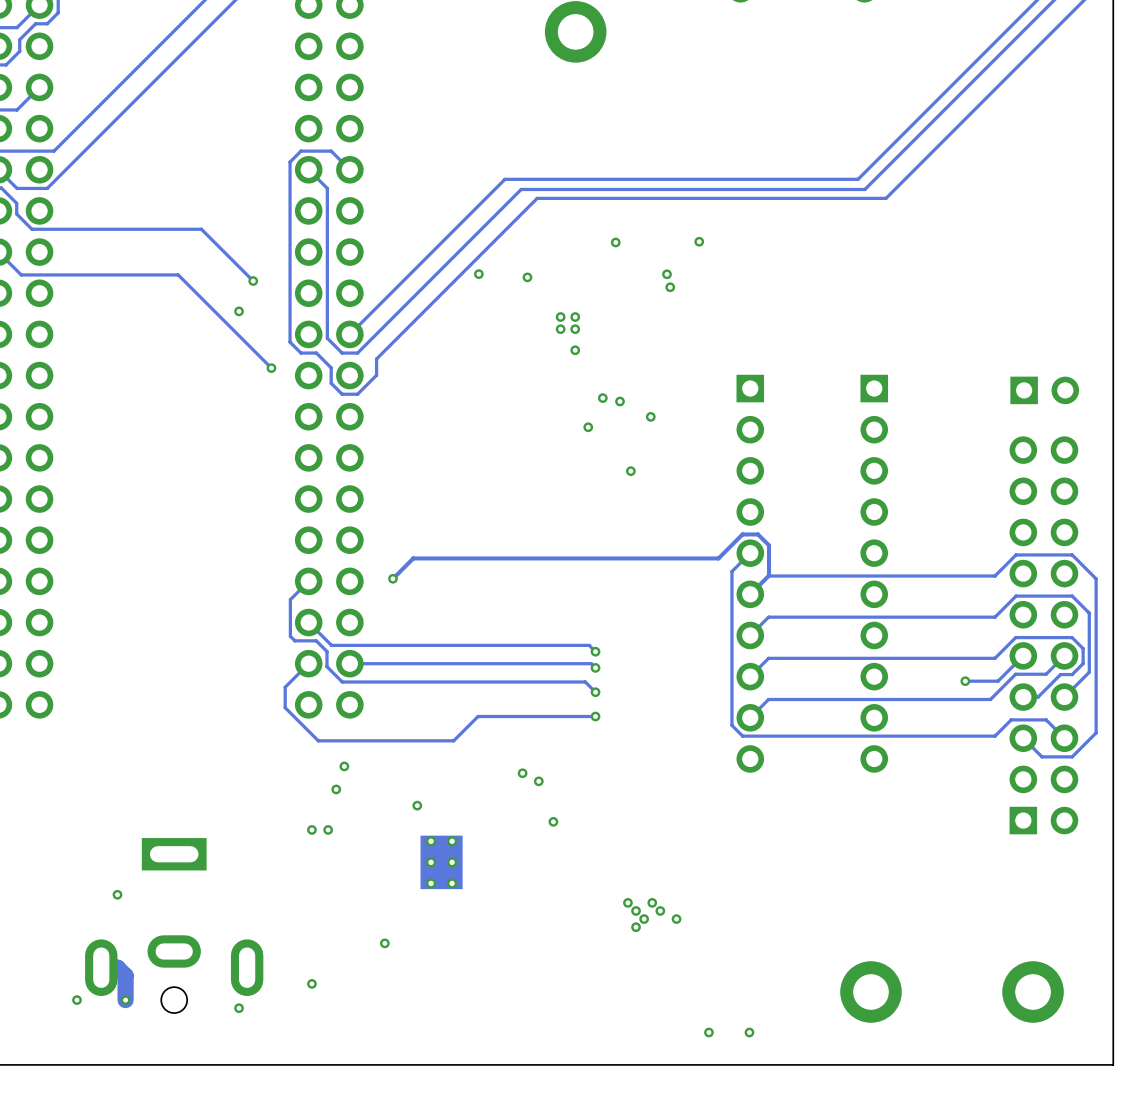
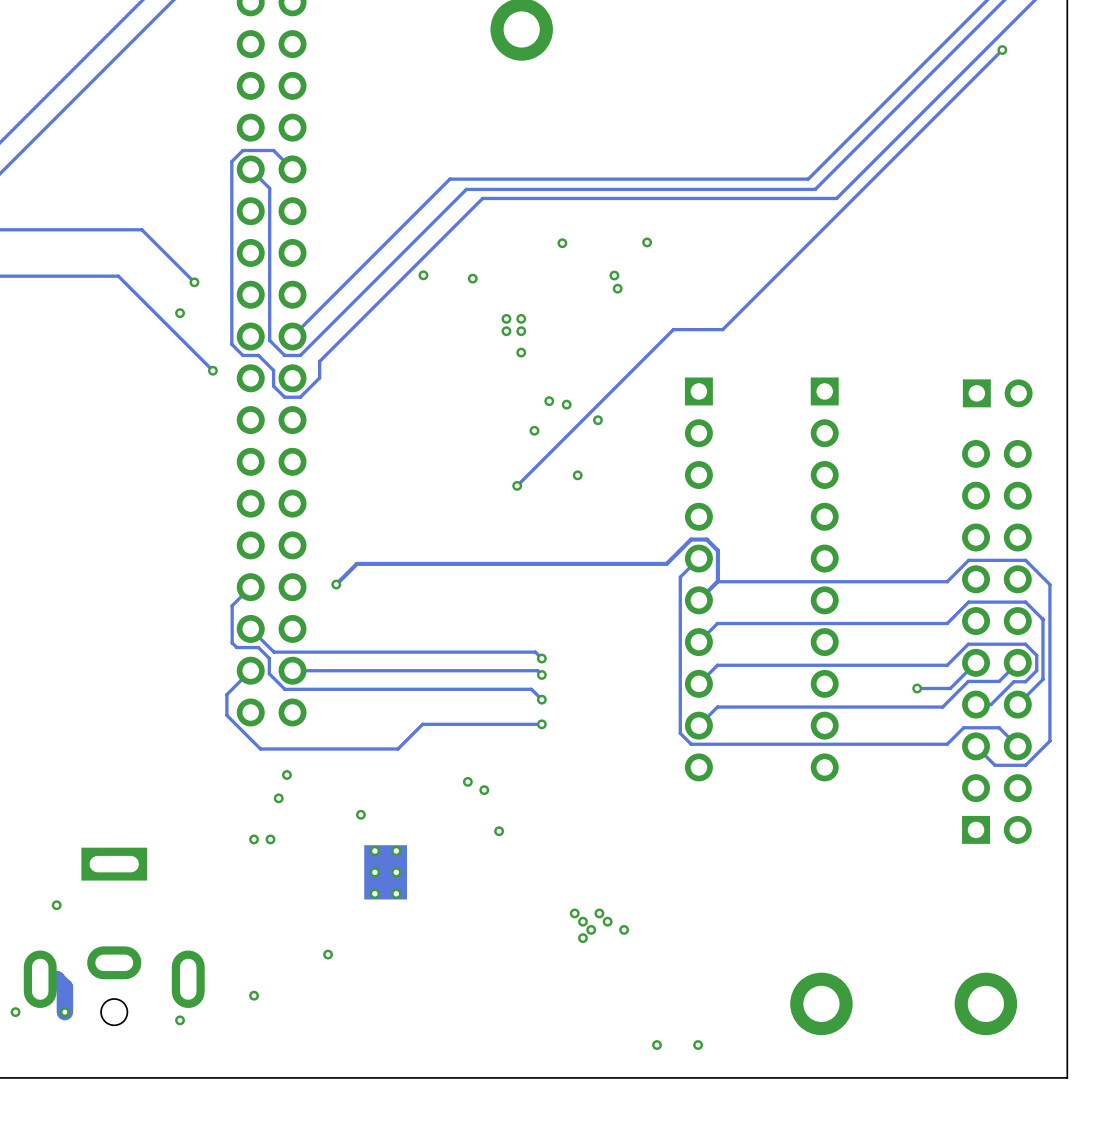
track: none -> (1002, 50) (722, 329) (673, 329) (517, 485)
via: none -> (1002, 50)
via: none -> (517, 485)

